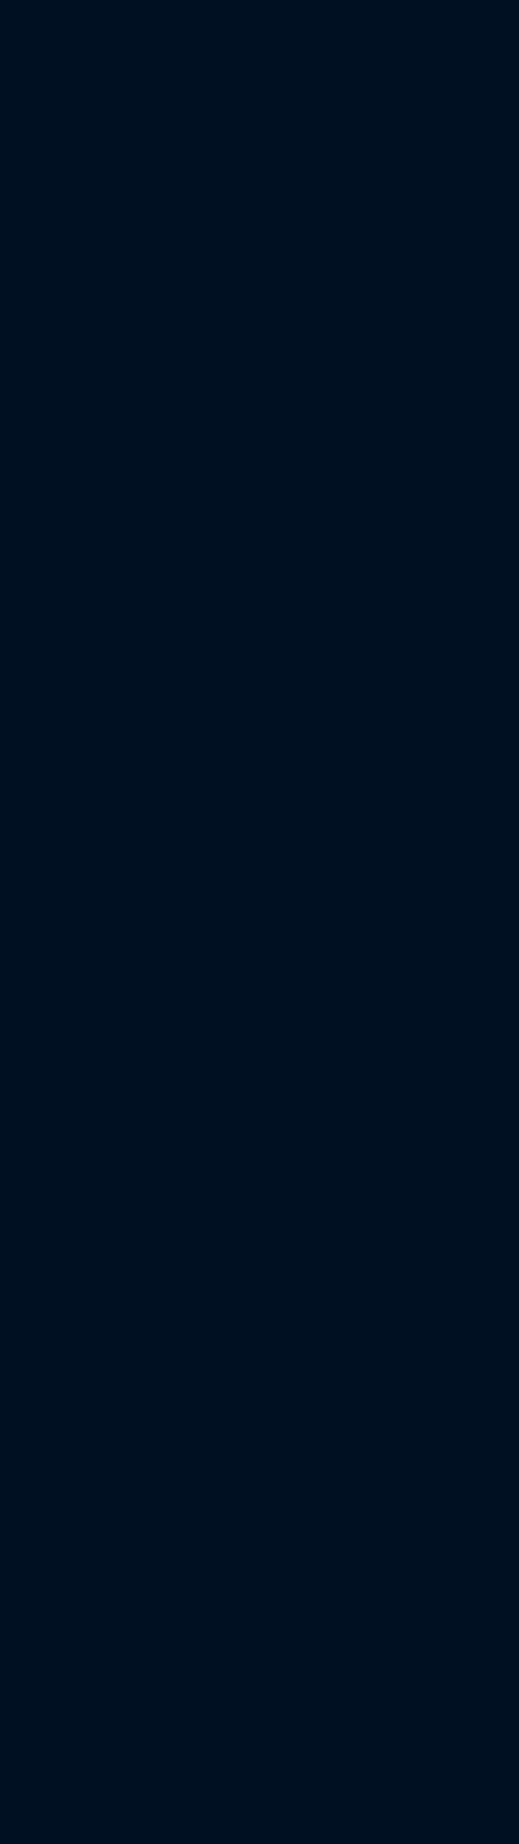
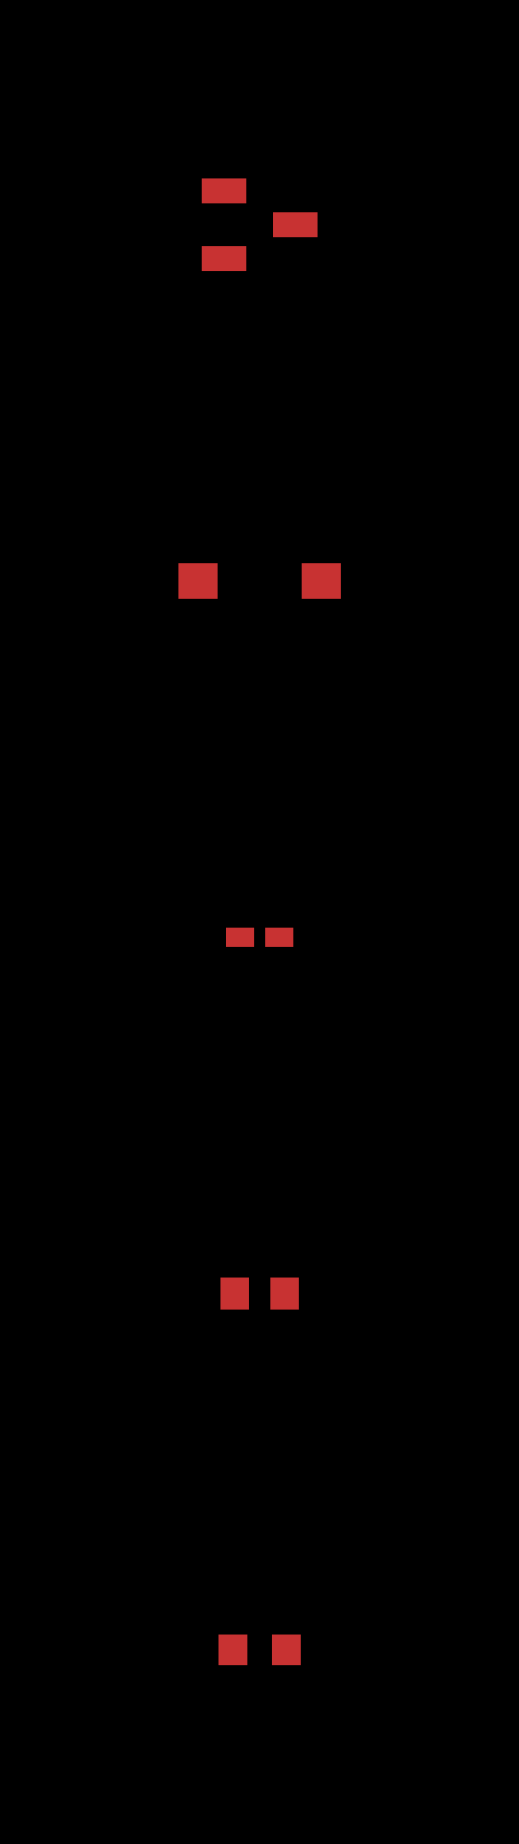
part: none -> (259, 224)
part: none -> (259, 581)
part: none -> (259, 937)
part: none -> (259, 1293)
part: none -> (259, 1649)

